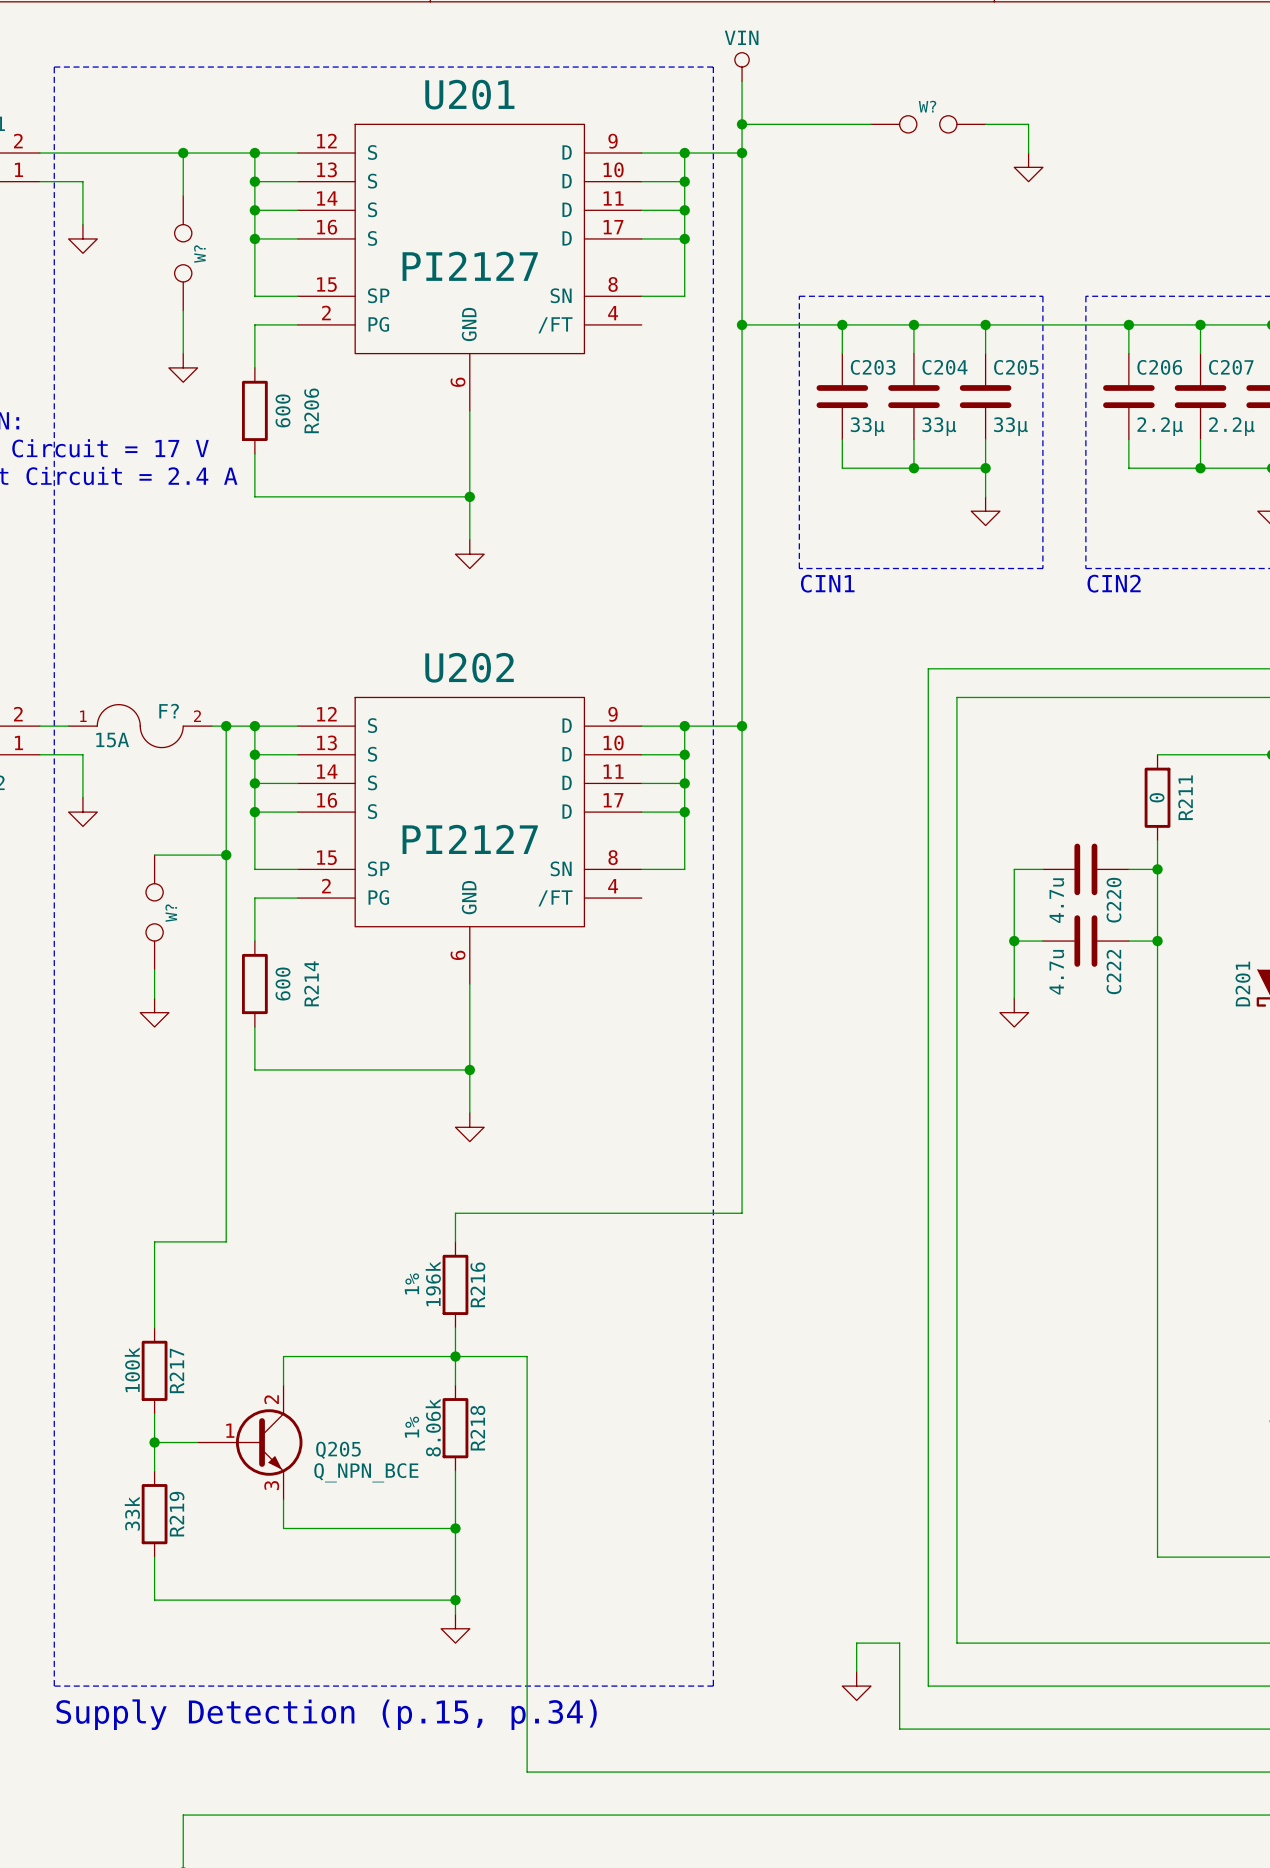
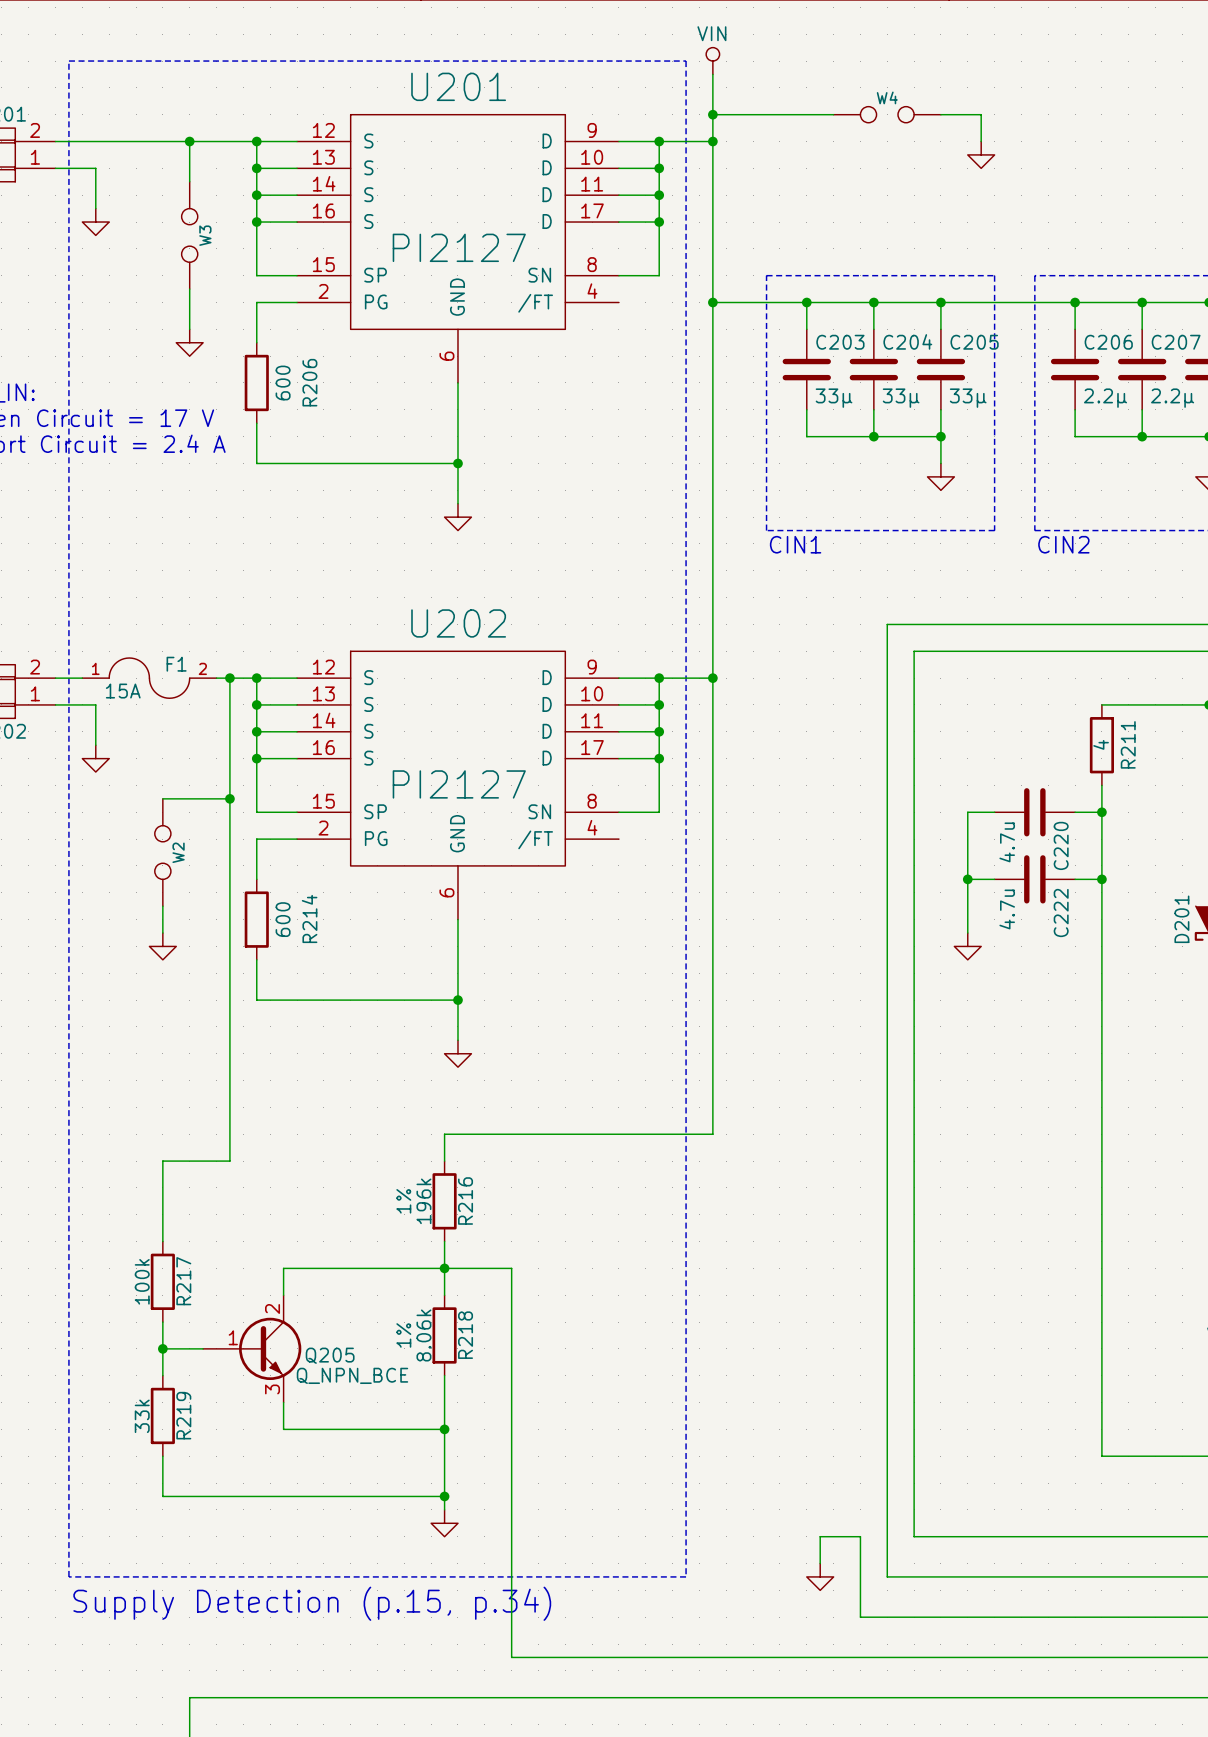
W? name: W? (927, 106) -> W4 (887, 97)
W? name: W? (199, 254) -> W3 (205, 235)
F? name: F? (169, 711) -> F1 (176, 664)
R211 value: 0 (1157, 797) -> 4 (1101, 744)
W? name: W? (171, 913) -> W2 (178, 852)

